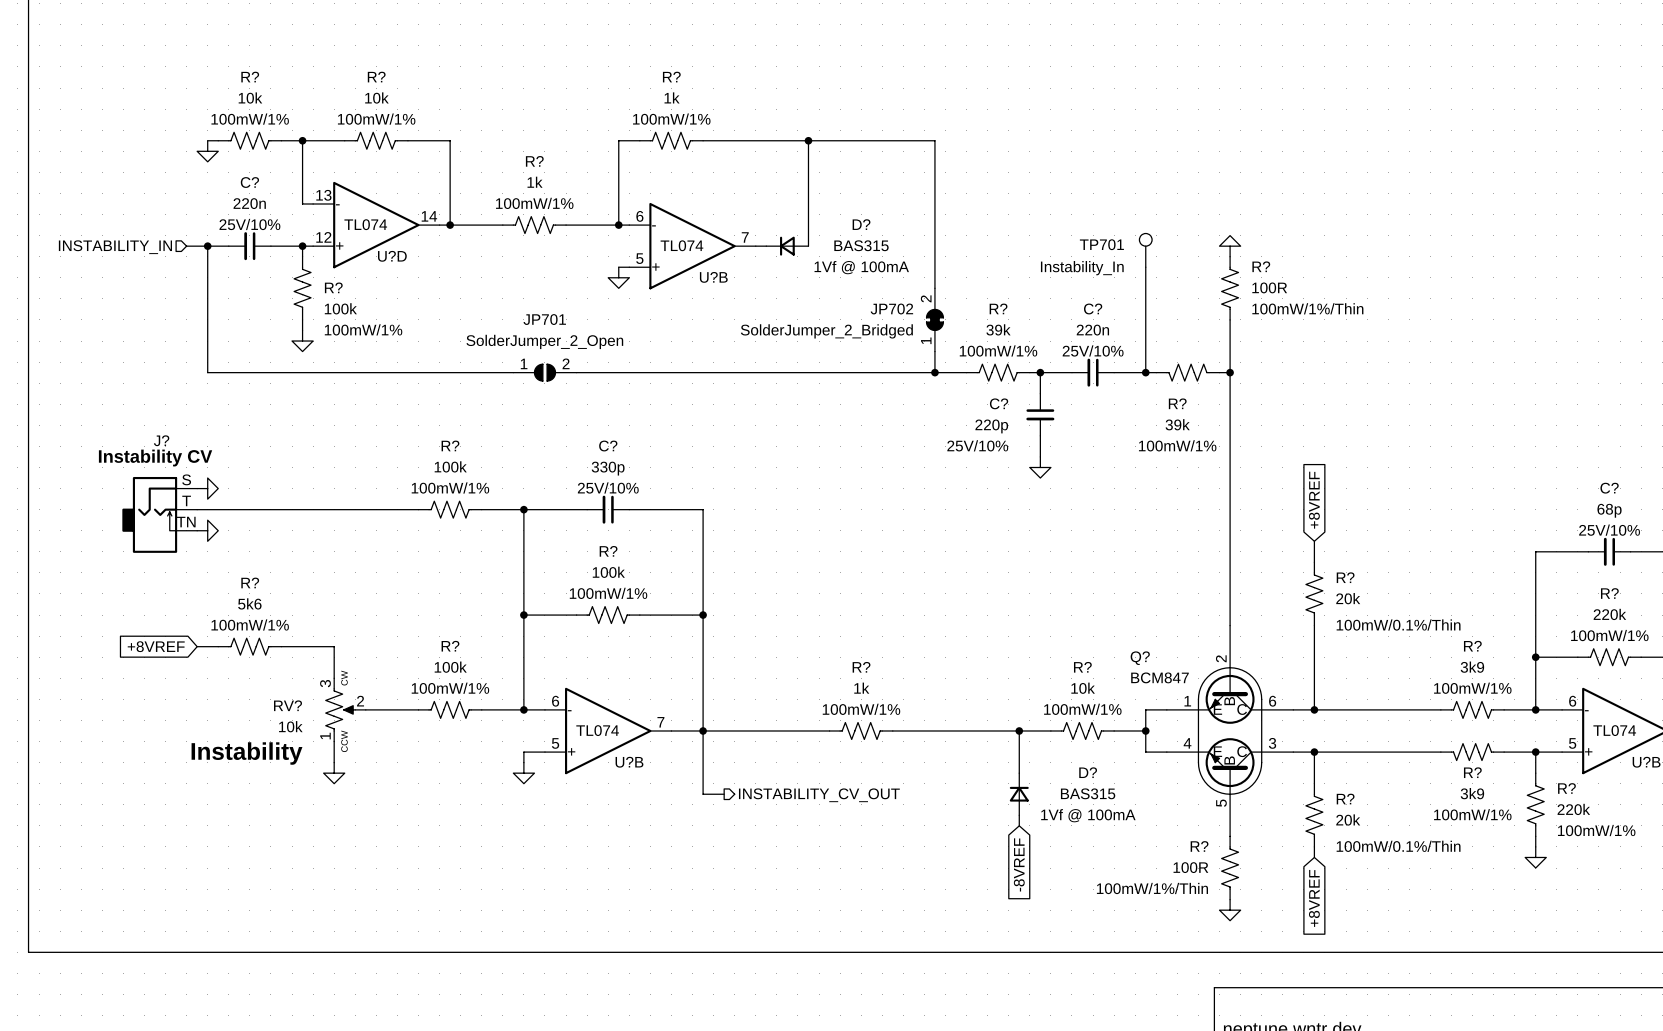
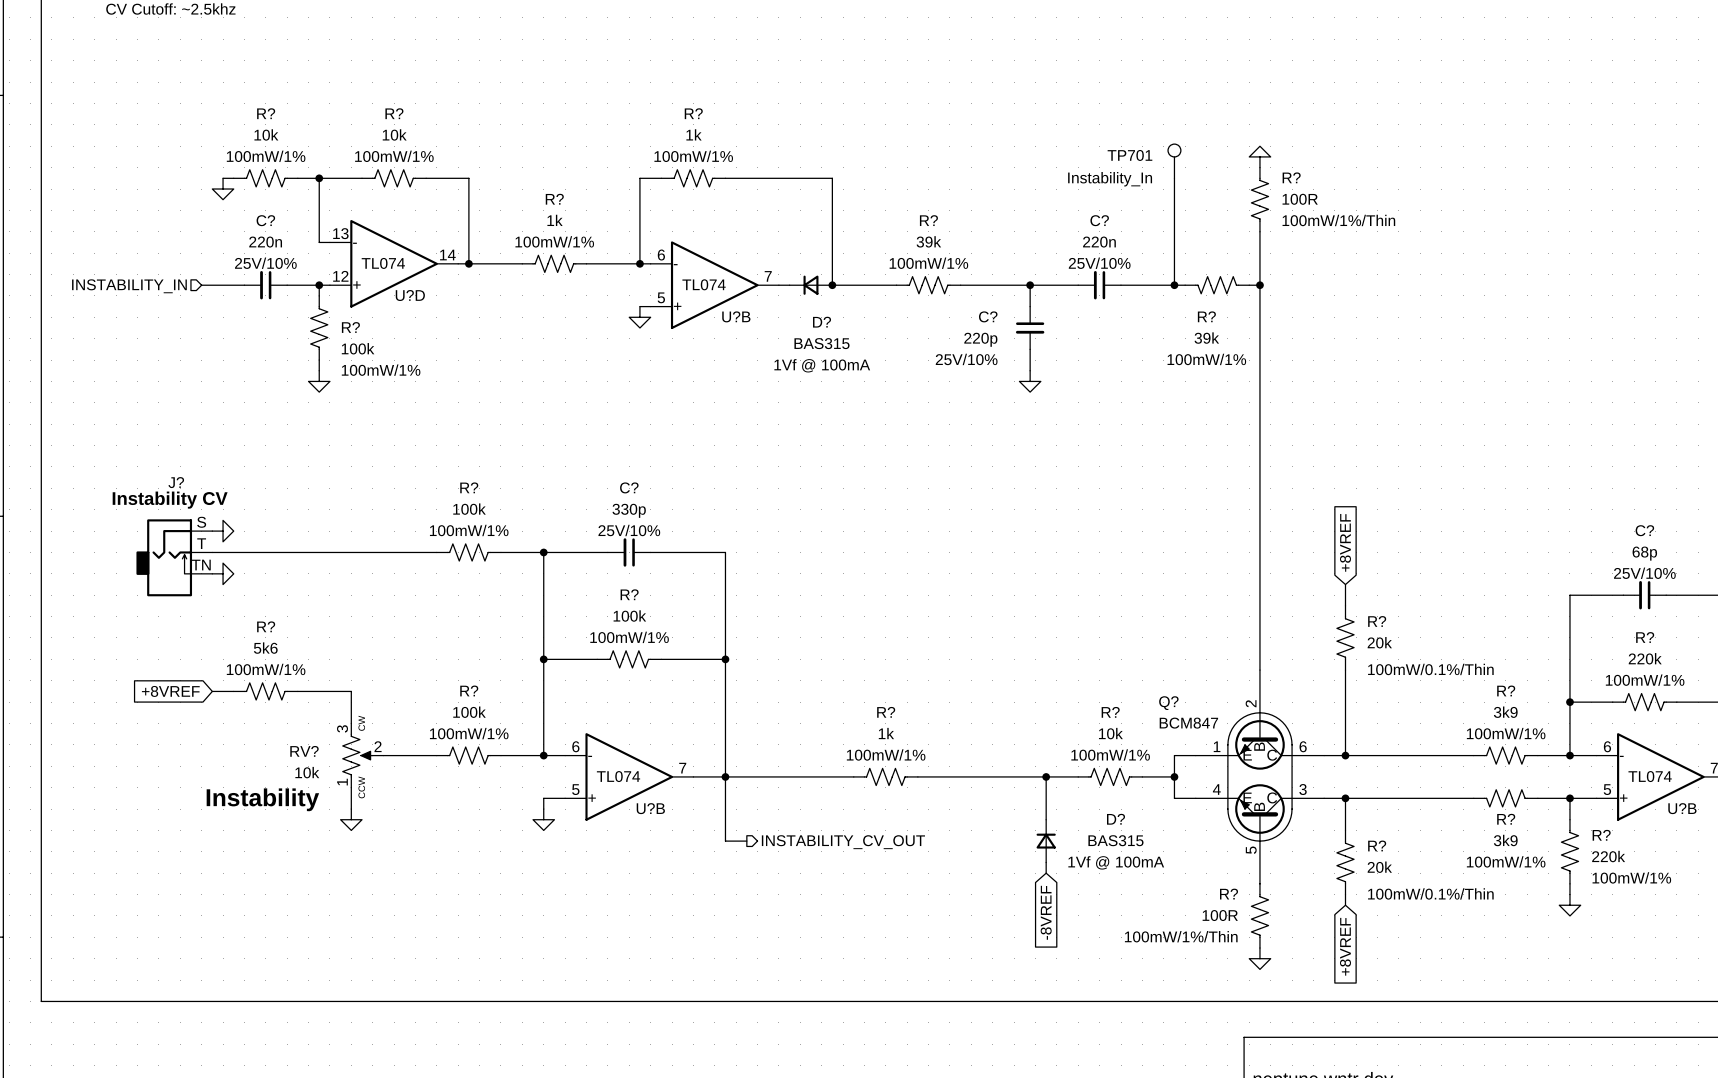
power symbol: none -> (1259, 156)
wire: (808, 140) (934, 140) (934, 288) -> none
junction: (808, 140) -> none
wire: none -> (1259, 231) (1259, 360)
D? name position: D? (861, 224) -> D? (822, 322)
D? value position: BAS315 (861, 245) -> BAS315 (821, 343)
wire: (207, 246) (207, 372) (513, 372) -> none
junction: (207, 246) -> none
wire: none -> (832, 285) (896, 285)
junction: none -> (832, 285)
wire: none -> (960, 285) (1078, 285)
junction: none -> (1030, 285)
wire: none -> (1121, 285) (1185, 285)
junction: none -> (1174, 285)
junction: none -> (1259, 285)
power symbol: (1230, 246) -> none
TP701 position: (1145, 250) -> (1174, 161)
D? text position: 1Vf @ 100mA (861, 267) -> 1Vf @ 100mA (822, 365)
wire: (1145, 267) (1145, 372) -> (1174, 178) (1174, 285)
R? position: (1230, 288) -> (1259, 199)
JP702: SolderJumper_2_Bridged (934, 319) -> none
power symbol: none -> (1030, 381)
wire: (934, 351) (934, 372) -> none
JP701: SolderJumper_2_Open (544, 372) -> none
wire: (576, 372) (966, 372) -> none
junction: (934, 372) -> none
R? position: (998, 372) -> (928, 285)
wire: (1029, 372) (1071, 372) -> none
wire: (1040, 372) (1040, 393) -> (1030, 285) (1030, 306)
junction: (1040, 372) -> none
C? position: (1093, 372) -> (1099, 285)
wire: (1114, 372) (1156, 372) -> none
junction: (1145, 372) -> none
R? position: (1187, 372) -> (1217, 285)
junction: (1230, 372) -> none
C? position: (1040, 414) -> (1030, 327)
wire: (1040, 435) (1040, 456) -> (1030, 349) (1030, 370)
power symbol: (1040, 467) -> none

